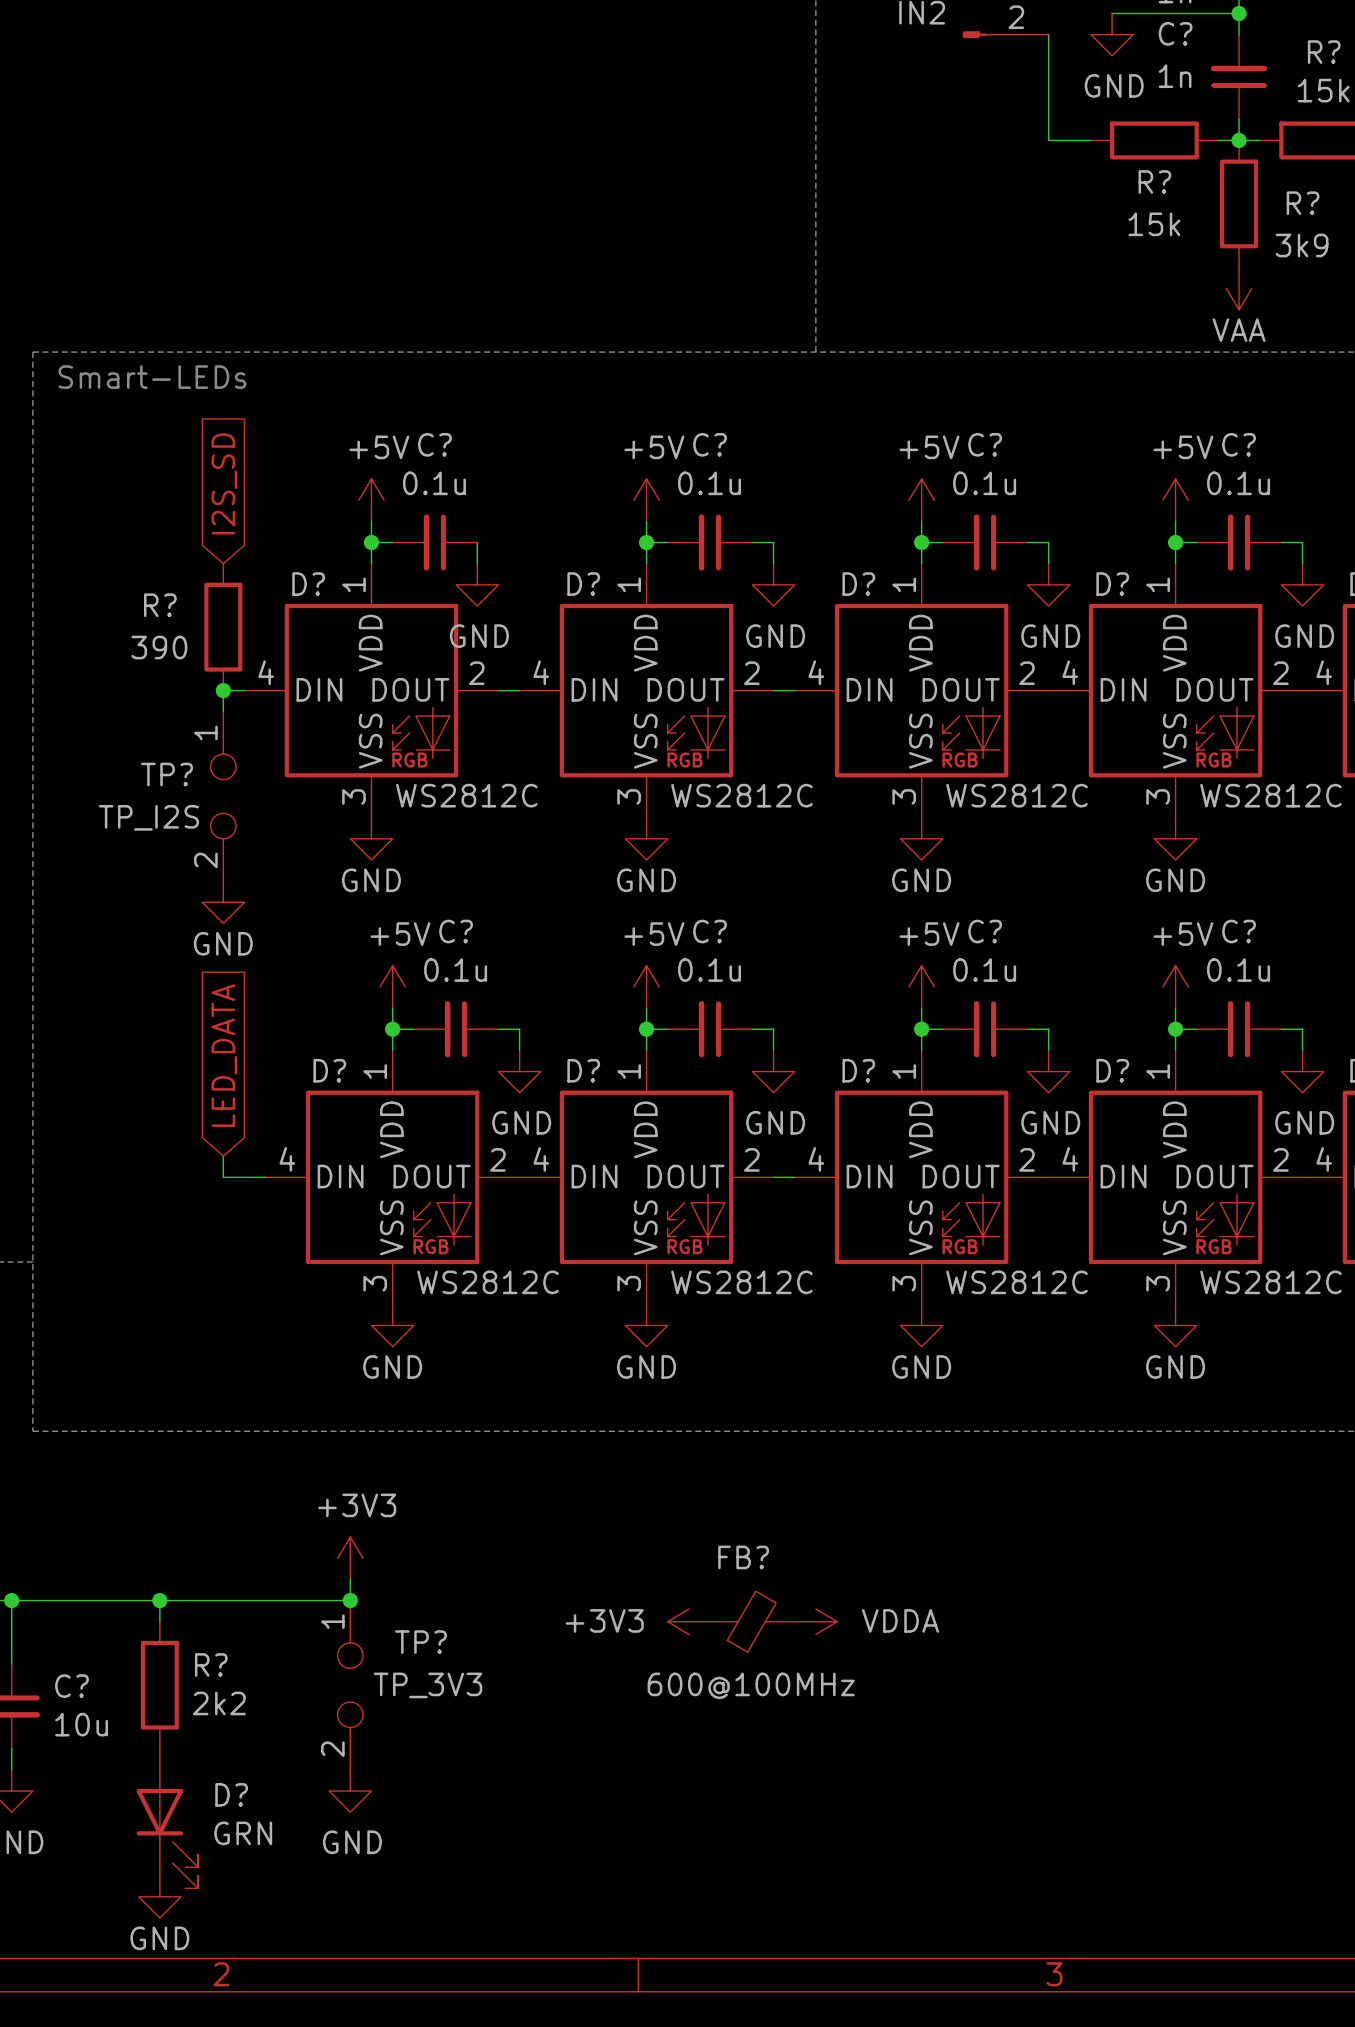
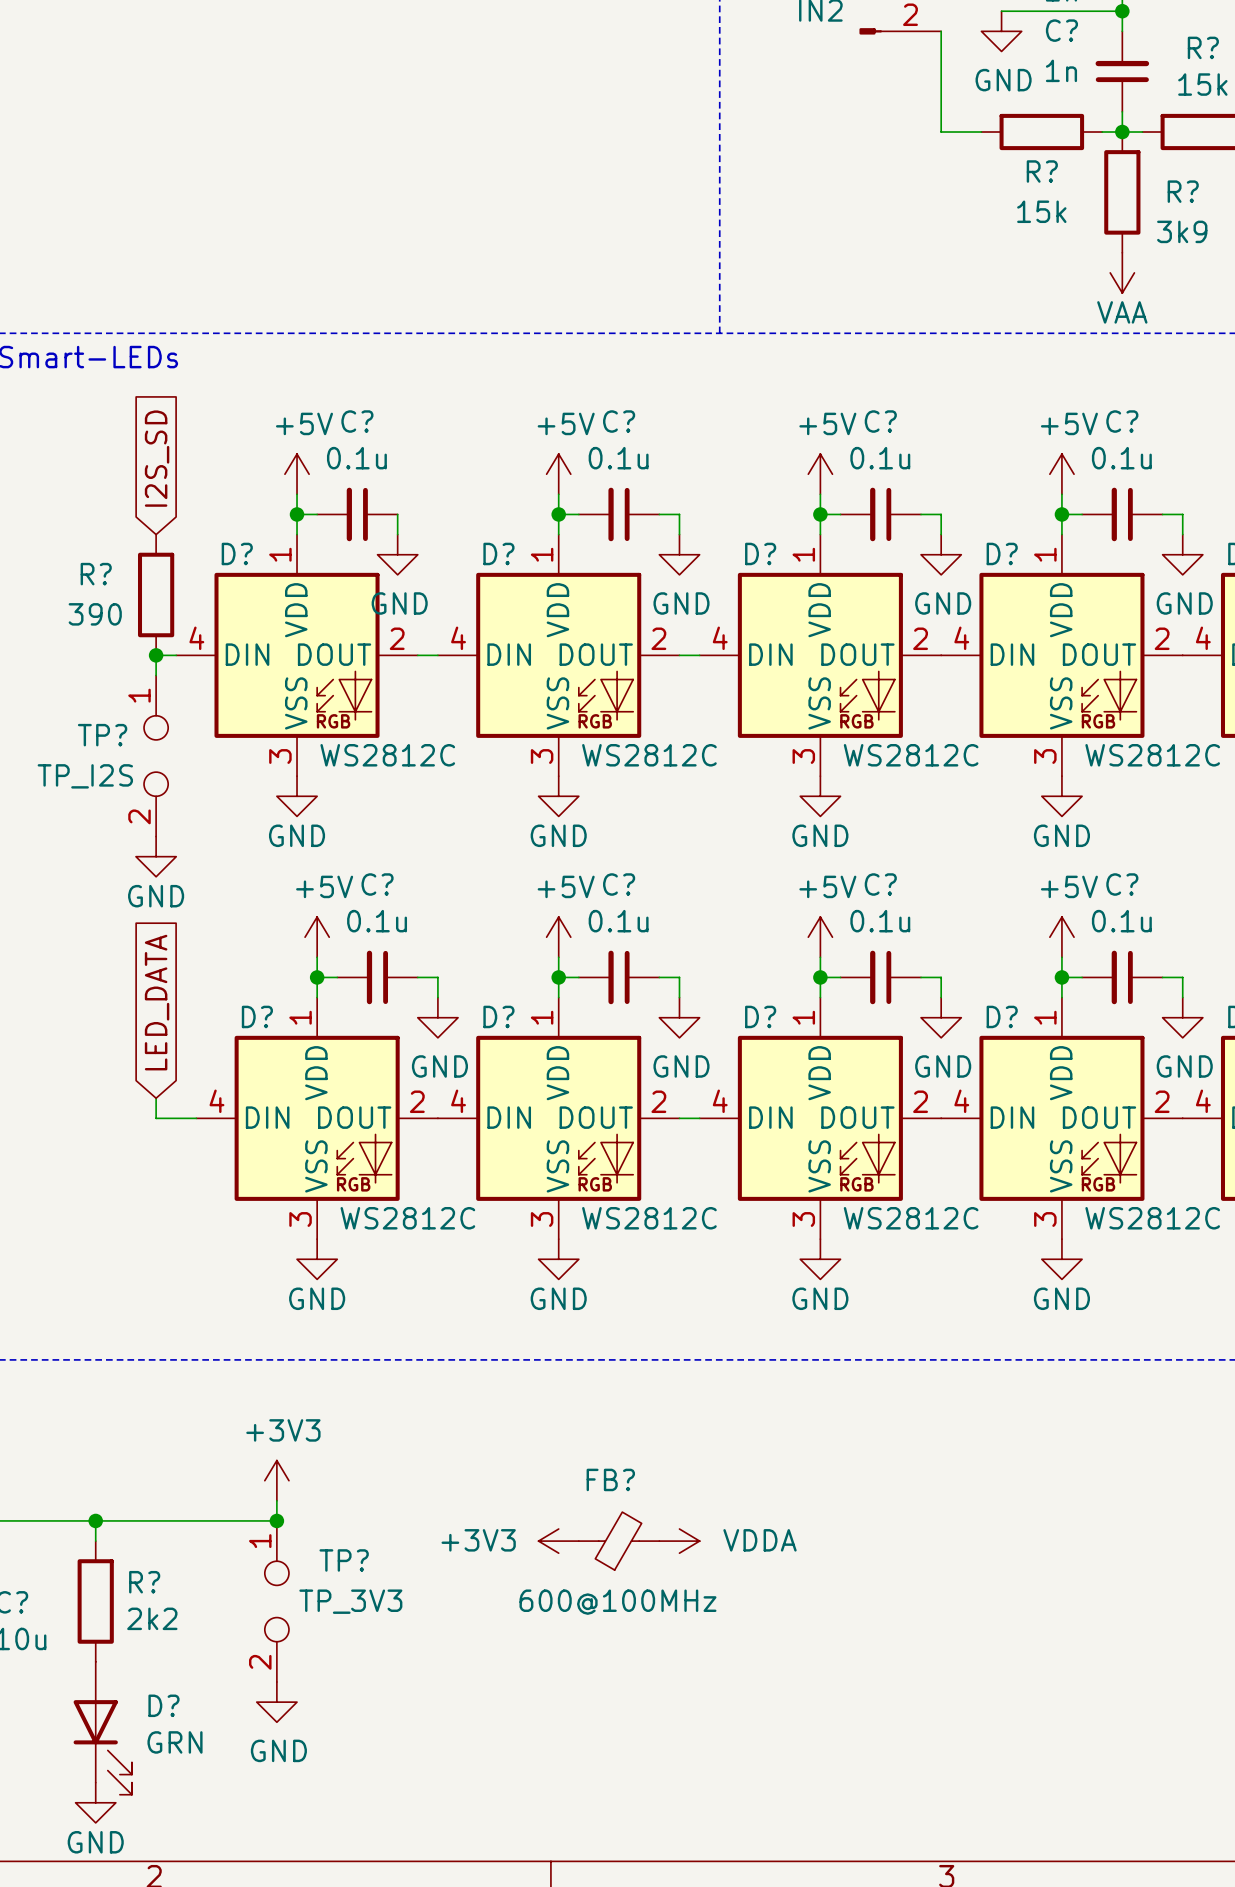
power symbol position: +3V3 (688, 1621) -> +3V3 (558, 1541)
FB? position: (752, 1621) -> (619, 1541)
power symbol position: VDDA (815, 1621) -> VDDA (679, 1541)

